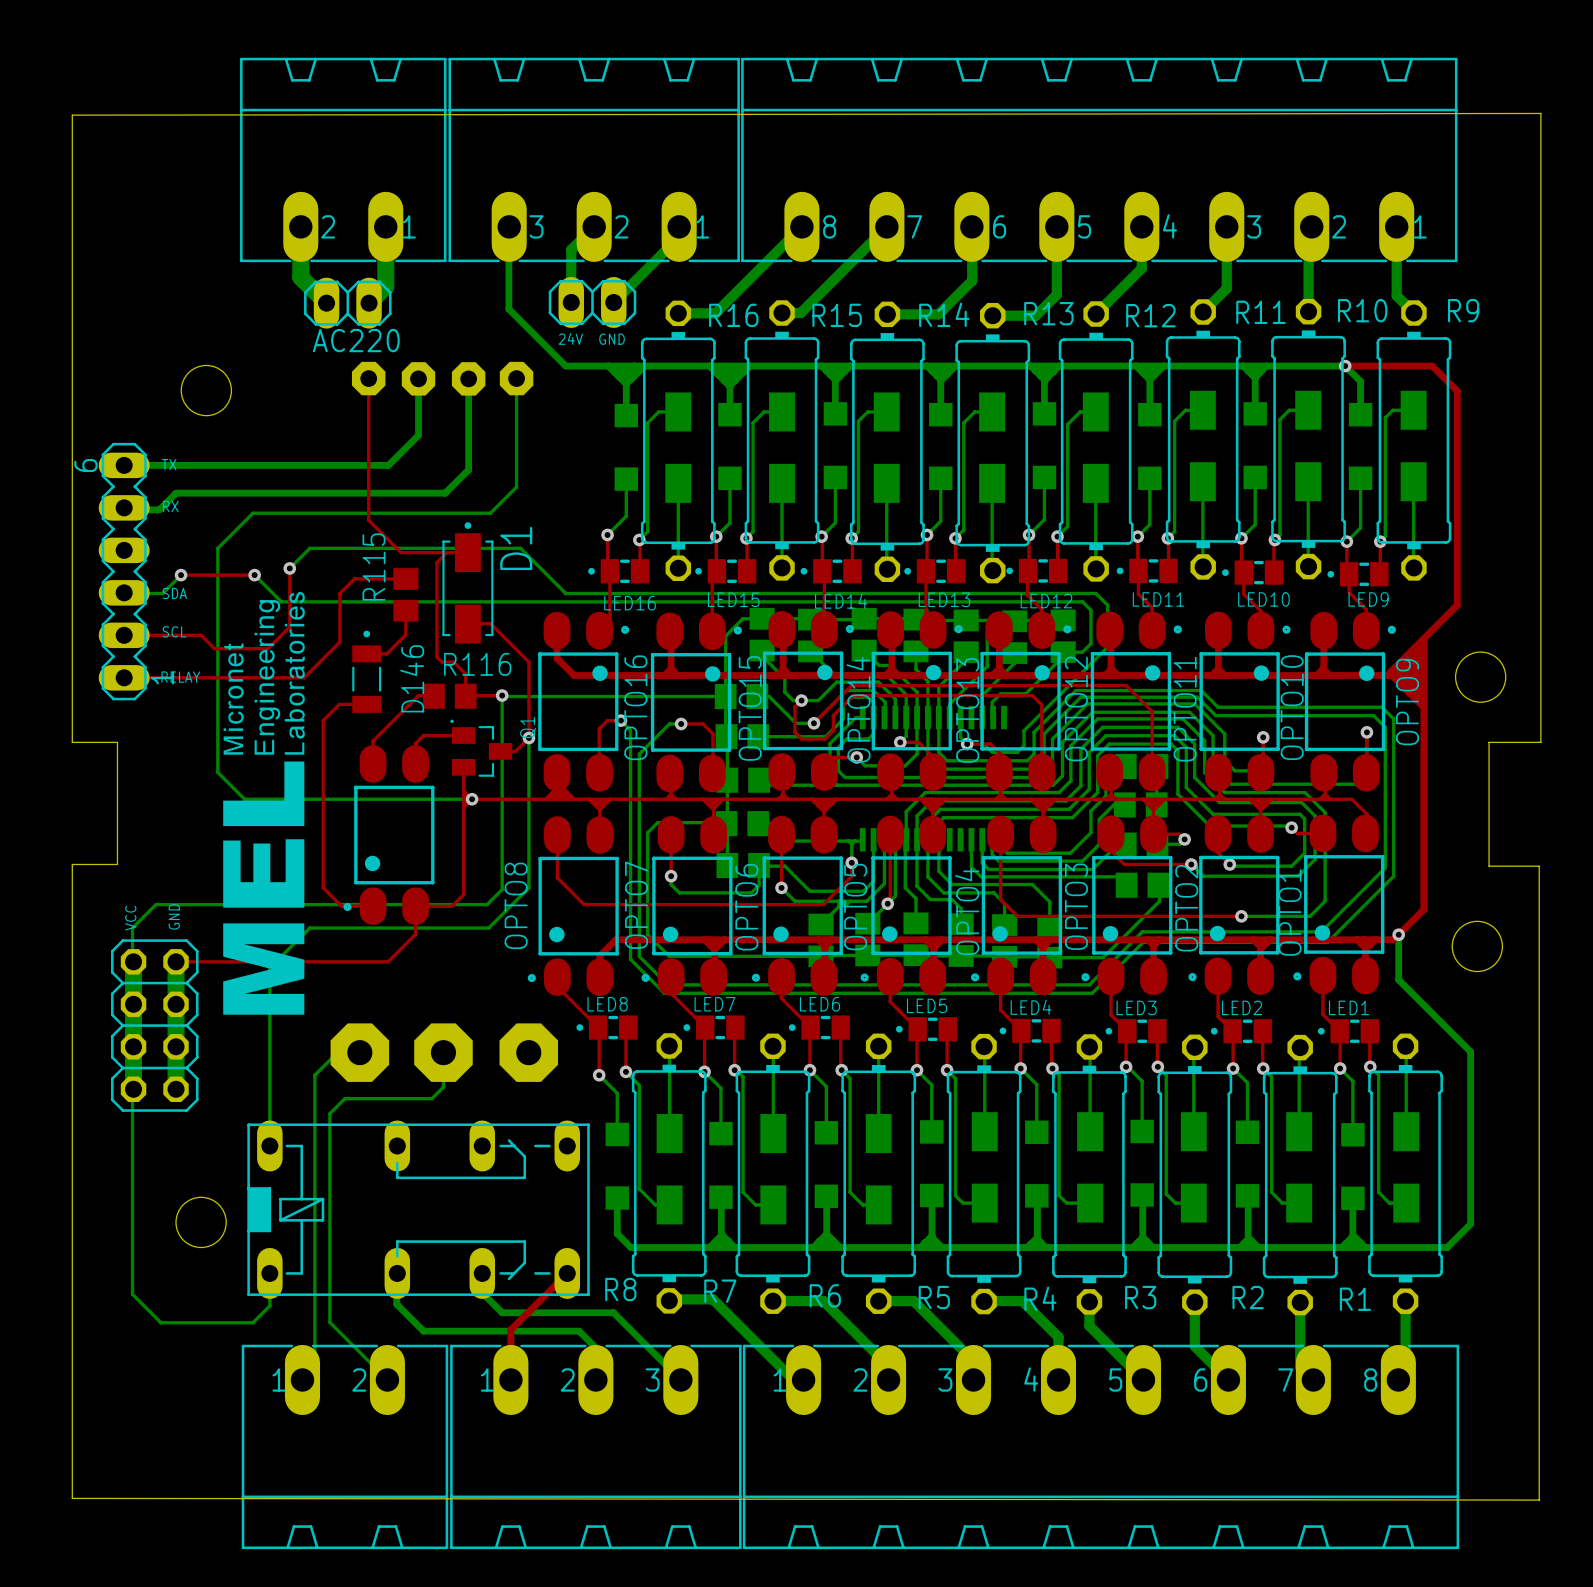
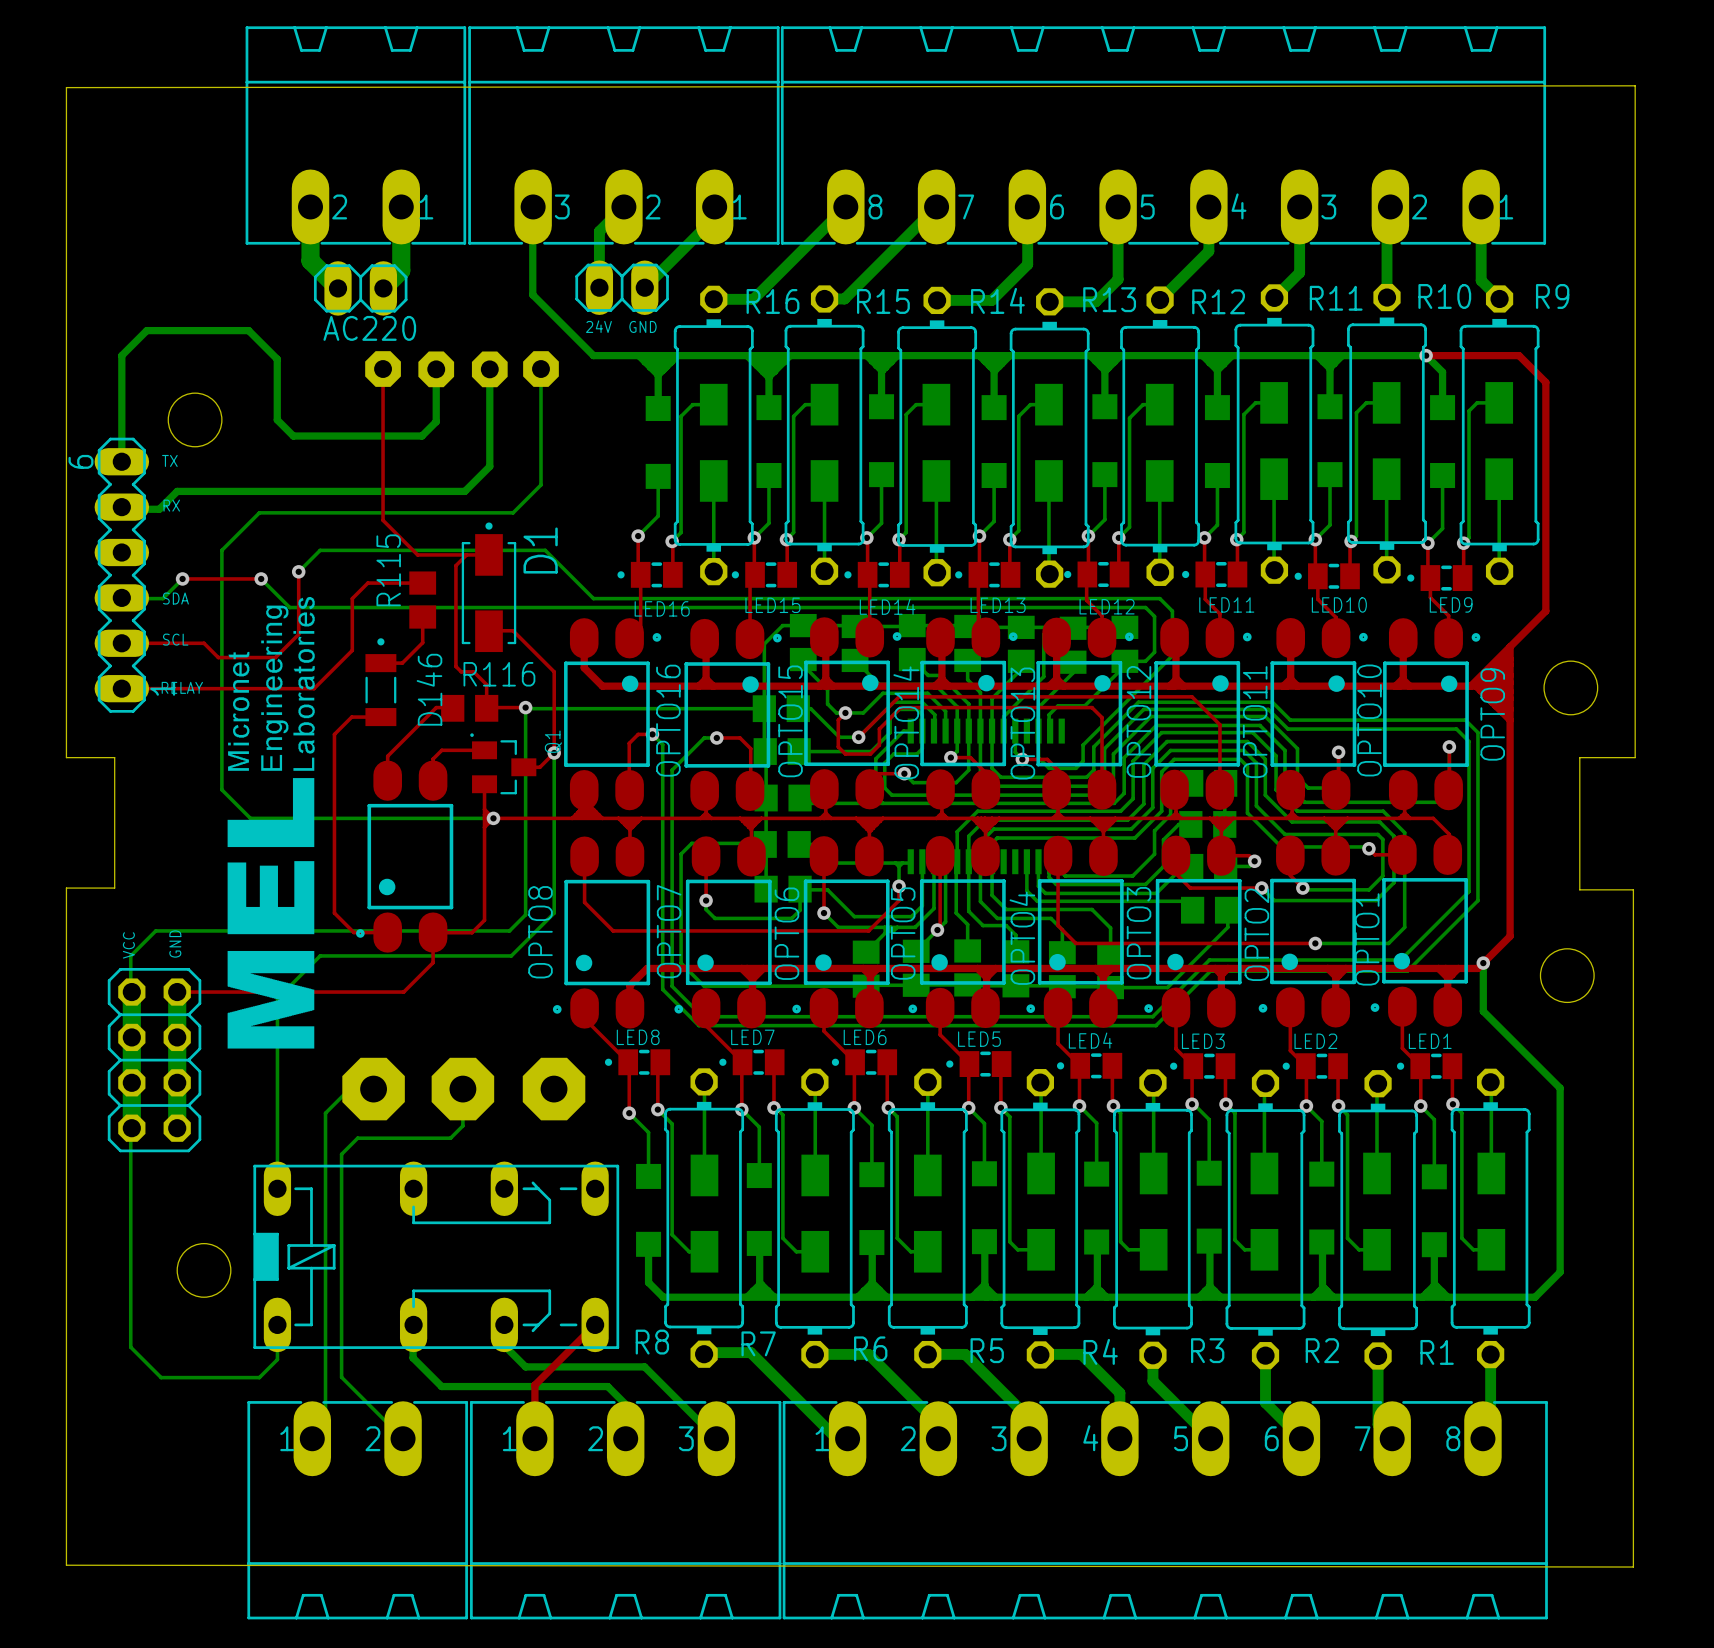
round board edge position: (206, 390) -> (195, 419)
bottom track: (418, 427) (418, 435) (388, 465) (124, 465) -> (436, 421) (421, 436) (293, 436) (277, 419) (277, 359) (248, 330) (146, 330) (121, 355) (121, 461)

